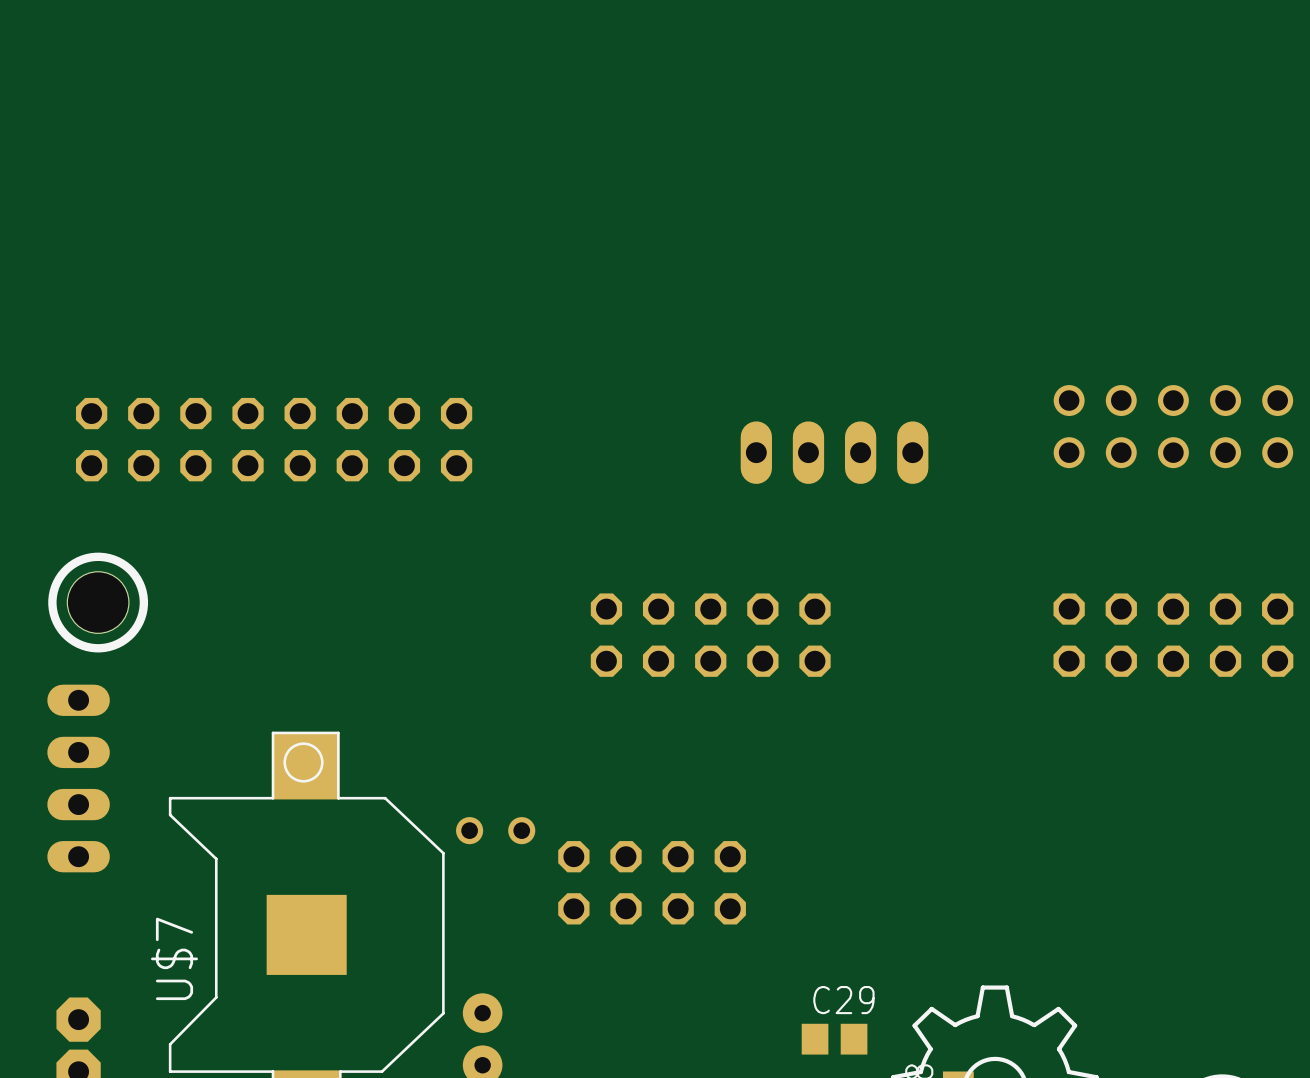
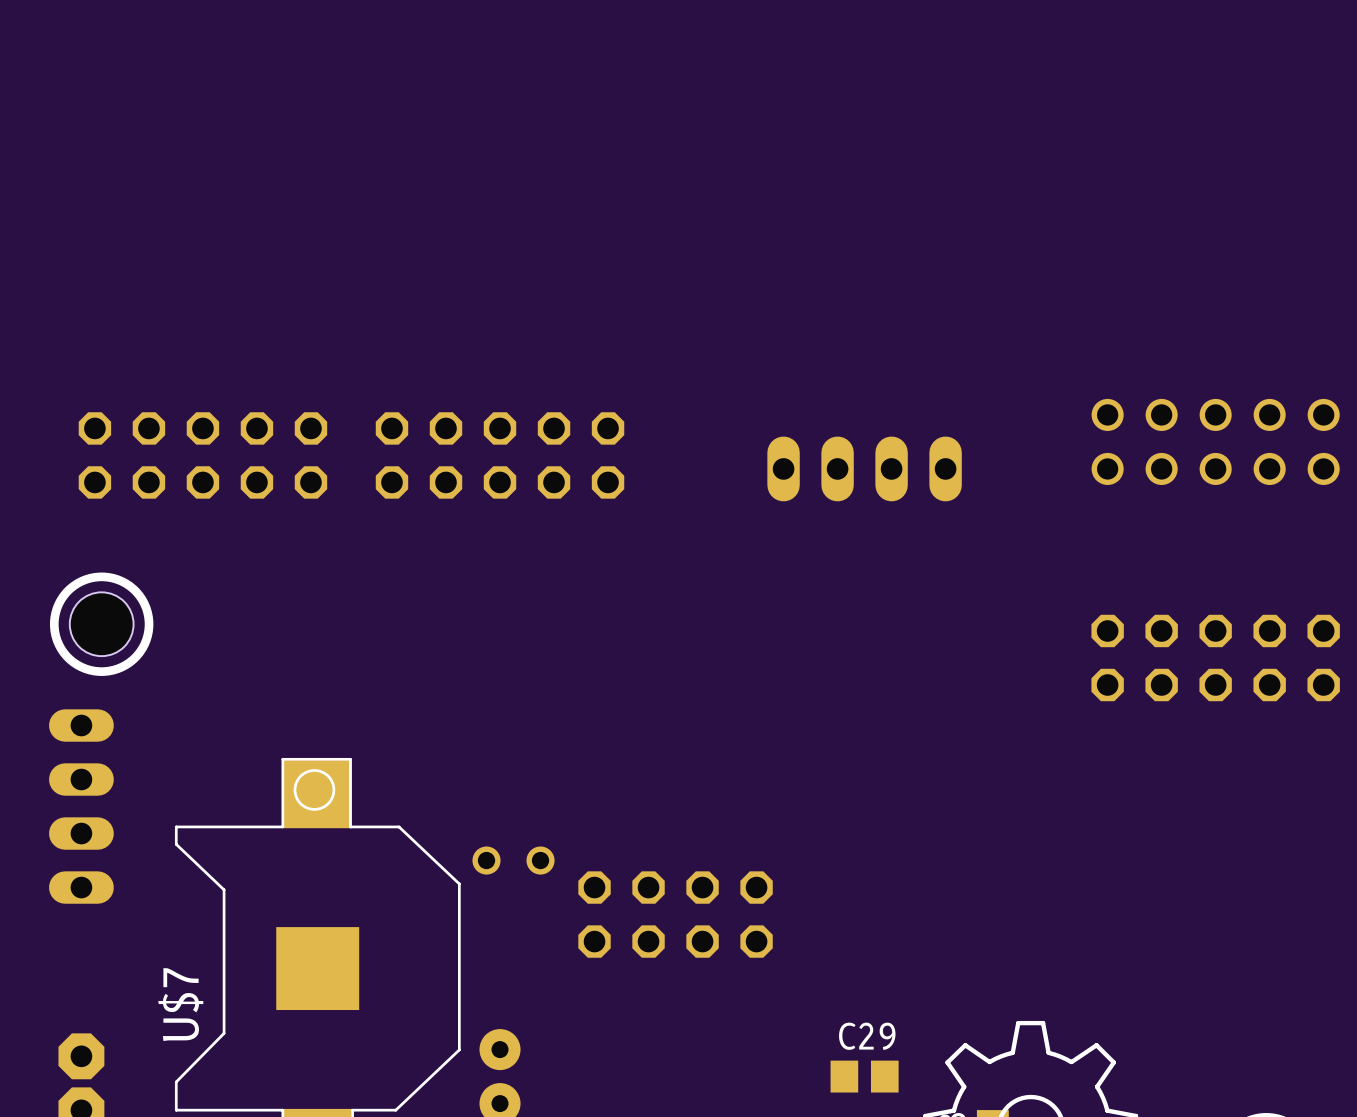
part: (274, 439) -> none
part: none -> (500, 455)
part: (710, 635) -> none

